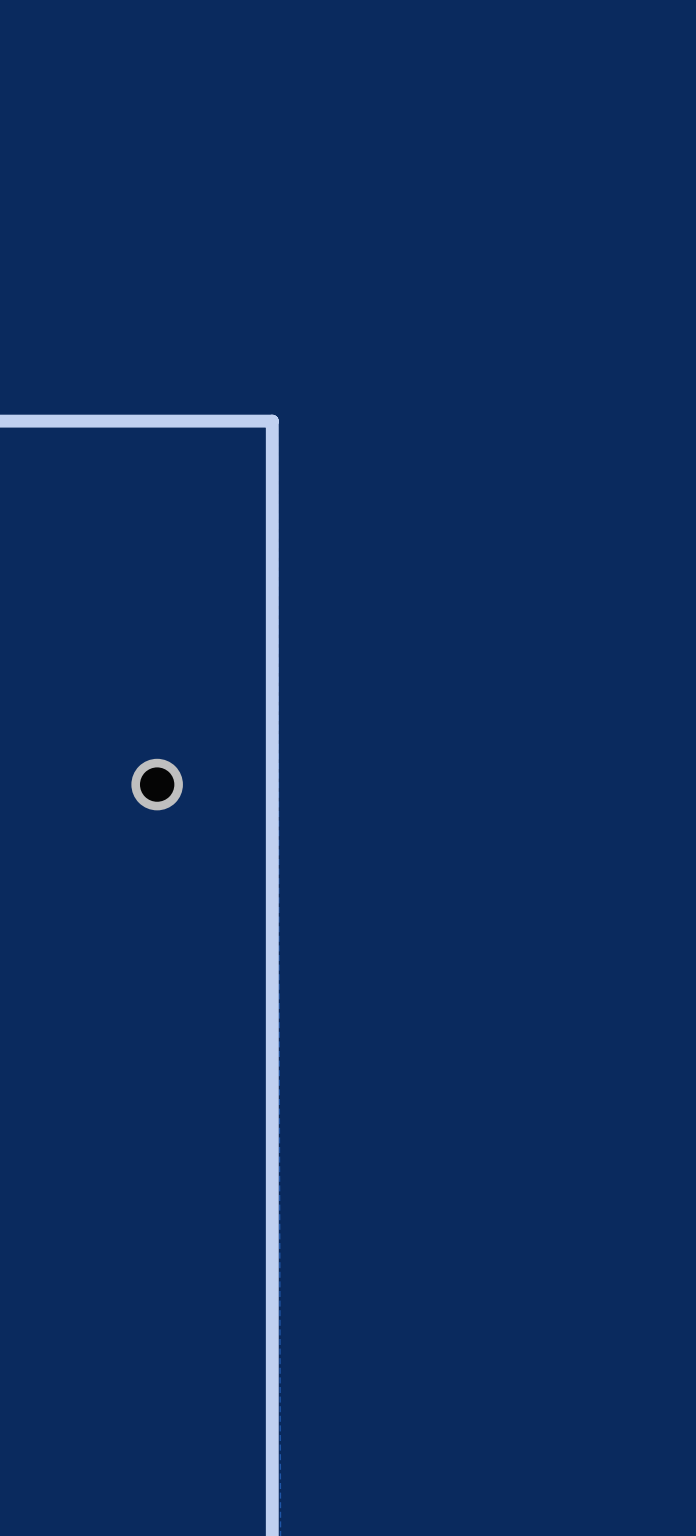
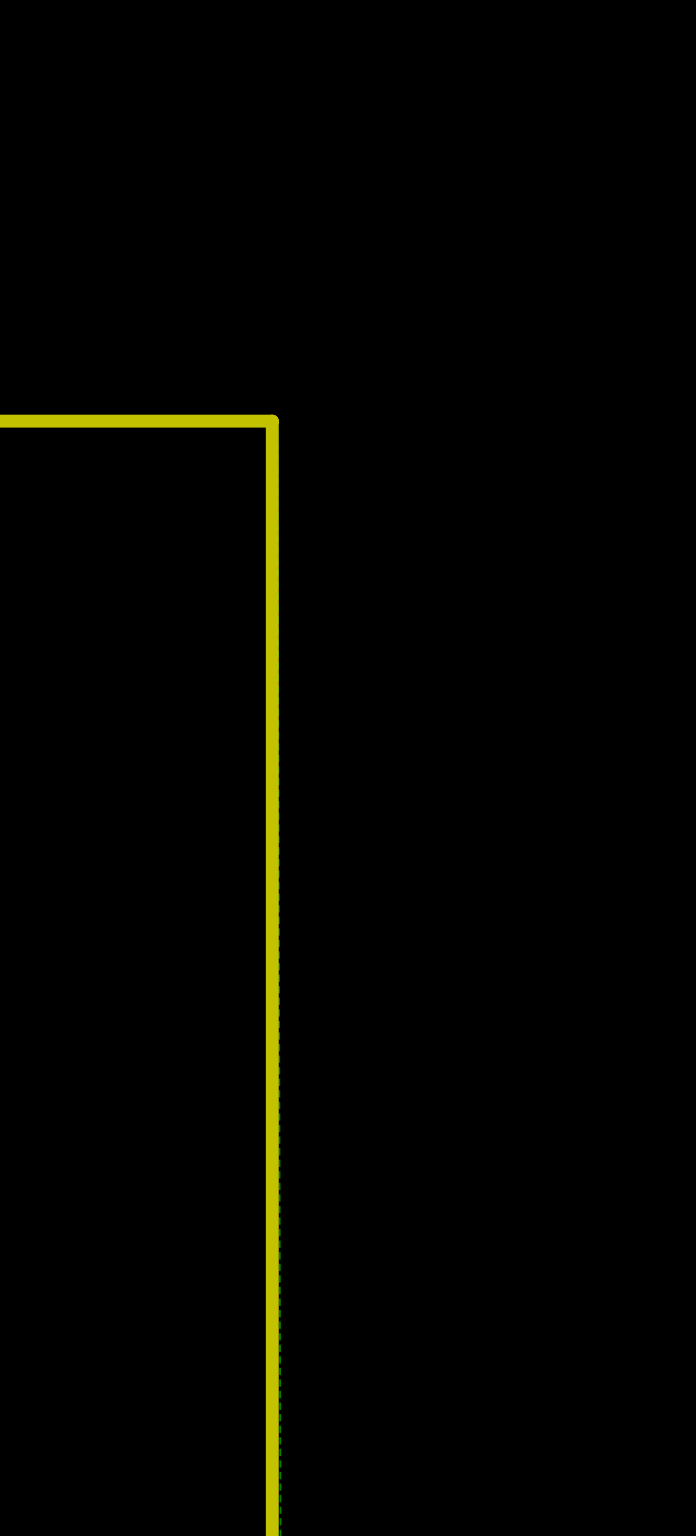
via: (157, 784) -> none

